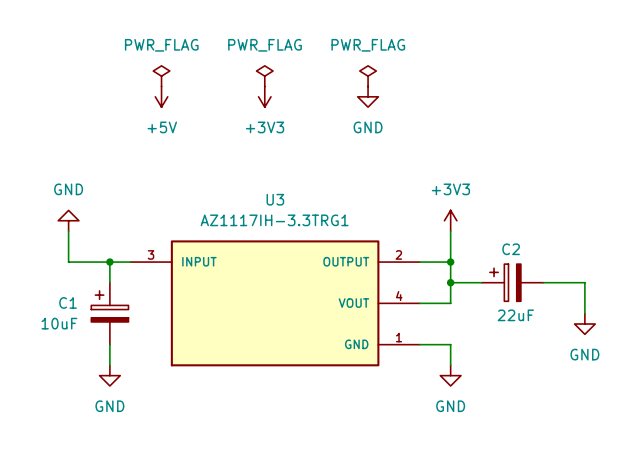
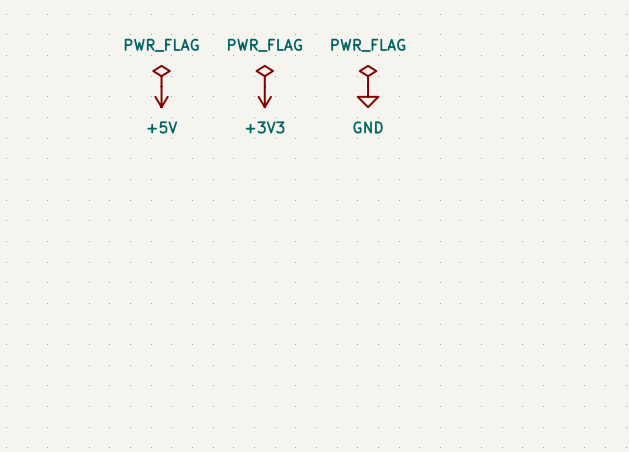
power symbol: GND (68, 220) -> none
power symbol: +3V3 (450, 220) -> none
wire: (68, 231) (68, 262) (130, 262) -> none
wire: (450, 231) (450, 303) (419, 303) -> none
wire: (109, 262) (109, 282) -> none
junction: (109, 262) -> none
wire: (419, 262) (450, 262) -> none
junction: (450, 262) -> none
wire: (450, 282) (481, 282) -> none
junction: (450, 282) -> none
C2: 22uF (512, 282) -> none
wire: (543, 282) (584, 282) (584, 313) -> none
U3: AZ1117IH-3.3TRG1 (275, 303) -> none
C1: 10uF (109, 313) -> none
power symbol: GND (584, 324) -> none
wire: (109, 344) (109, 365) -> none
wire: (419, 344) (450, 344) (450, 365) -> none
power symbol: GND (109, 375) -> none
power symbol: GND (450, 375) -> none

